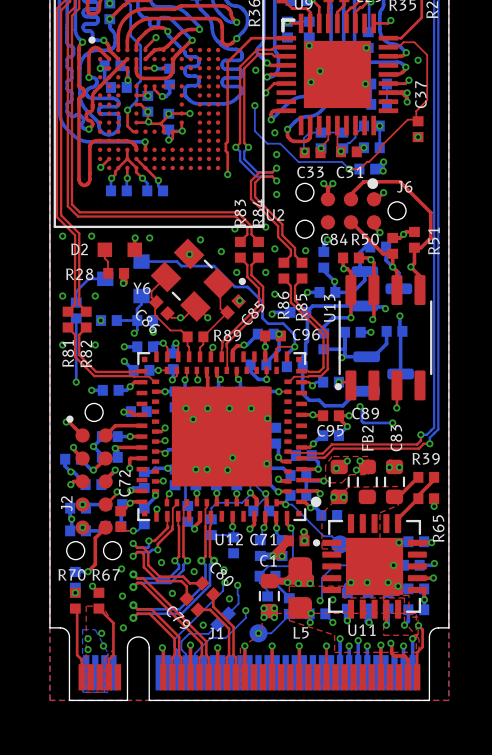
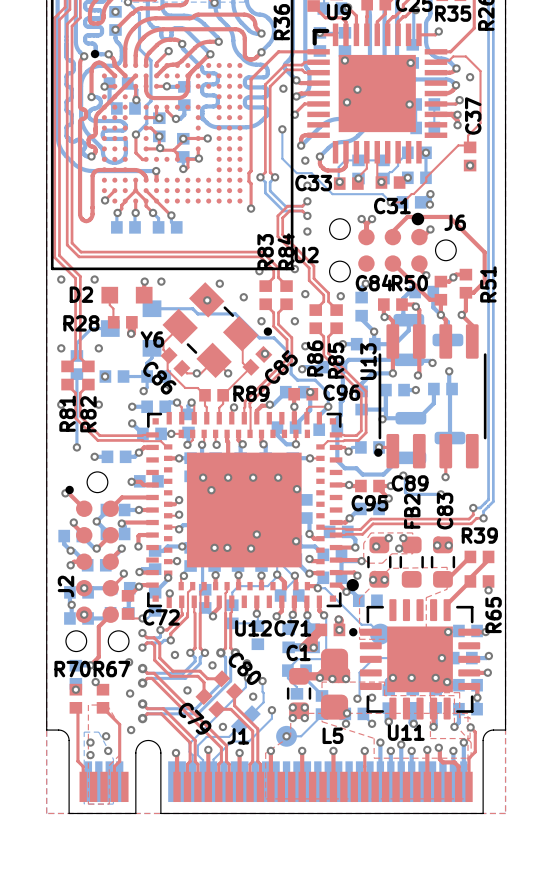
C33 name position: C33 (310, 172) -> C33 (313, 183)
C72 name rotation: 0° (124, 483) -> 90° clockwise (161, 617)
C72 name position: C72 (124, 483) -> C72 (161, 617)

